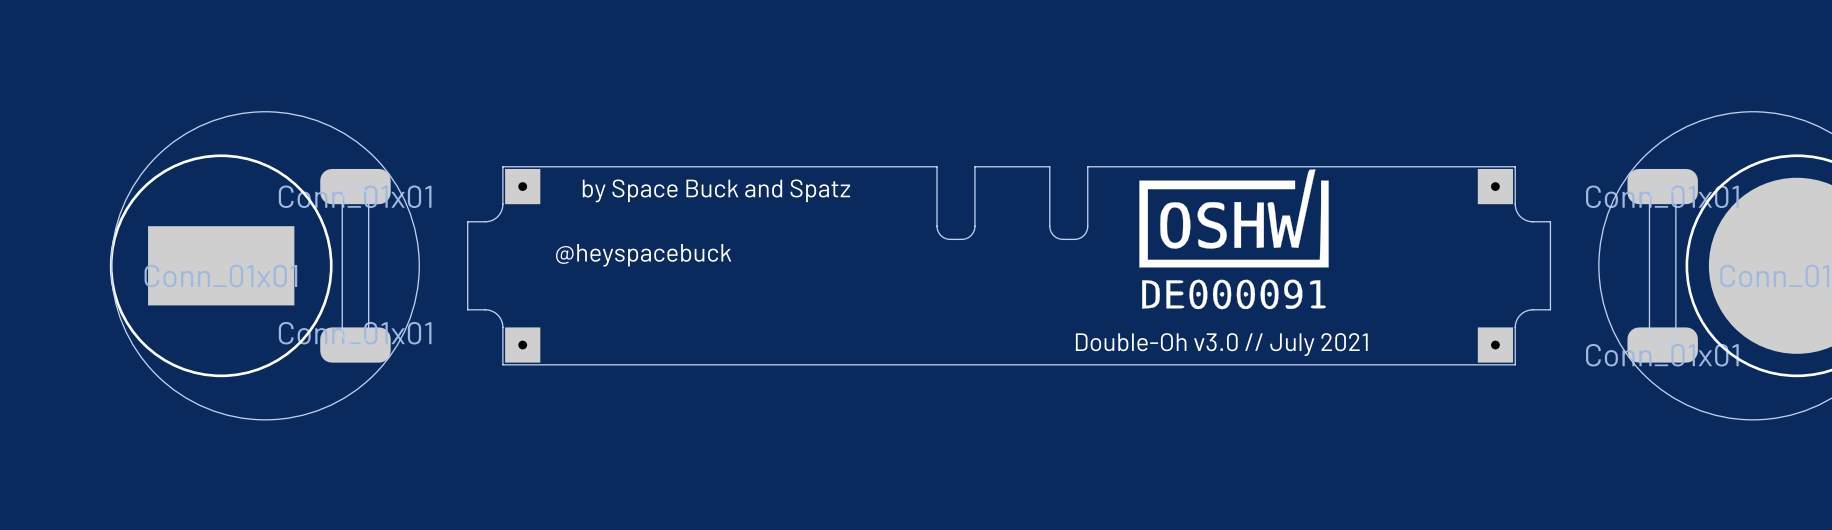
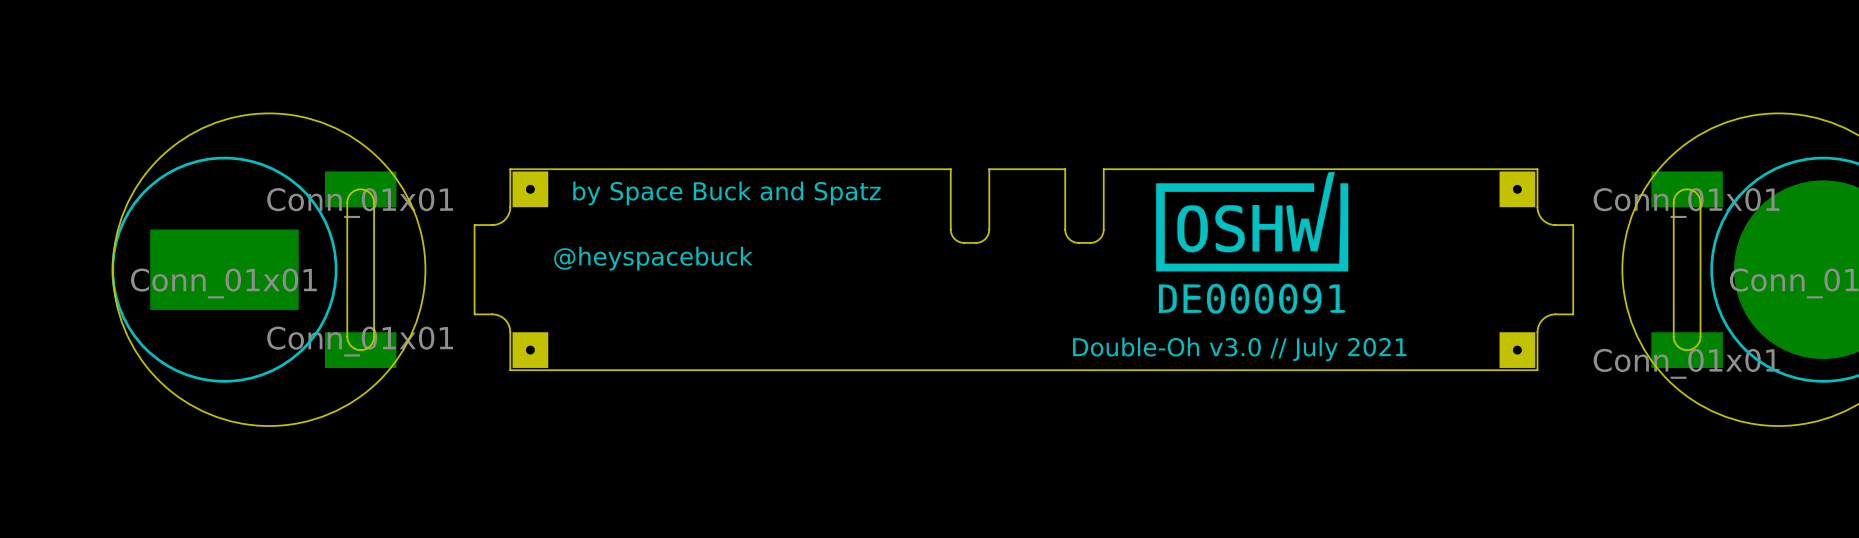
part footprint: [320, 168, 391, 205] -> [324, 171, 397, 208]
part footprint: [1627, 168, 1698, 205] -> [1651, 171, 1723, 208]
part footprint: [320, 327, 391, 363] -> [324, 332, 397, 368]
part footprint: [1627, 327, 1698, 363] -> [1651, 332, 1723, 368]

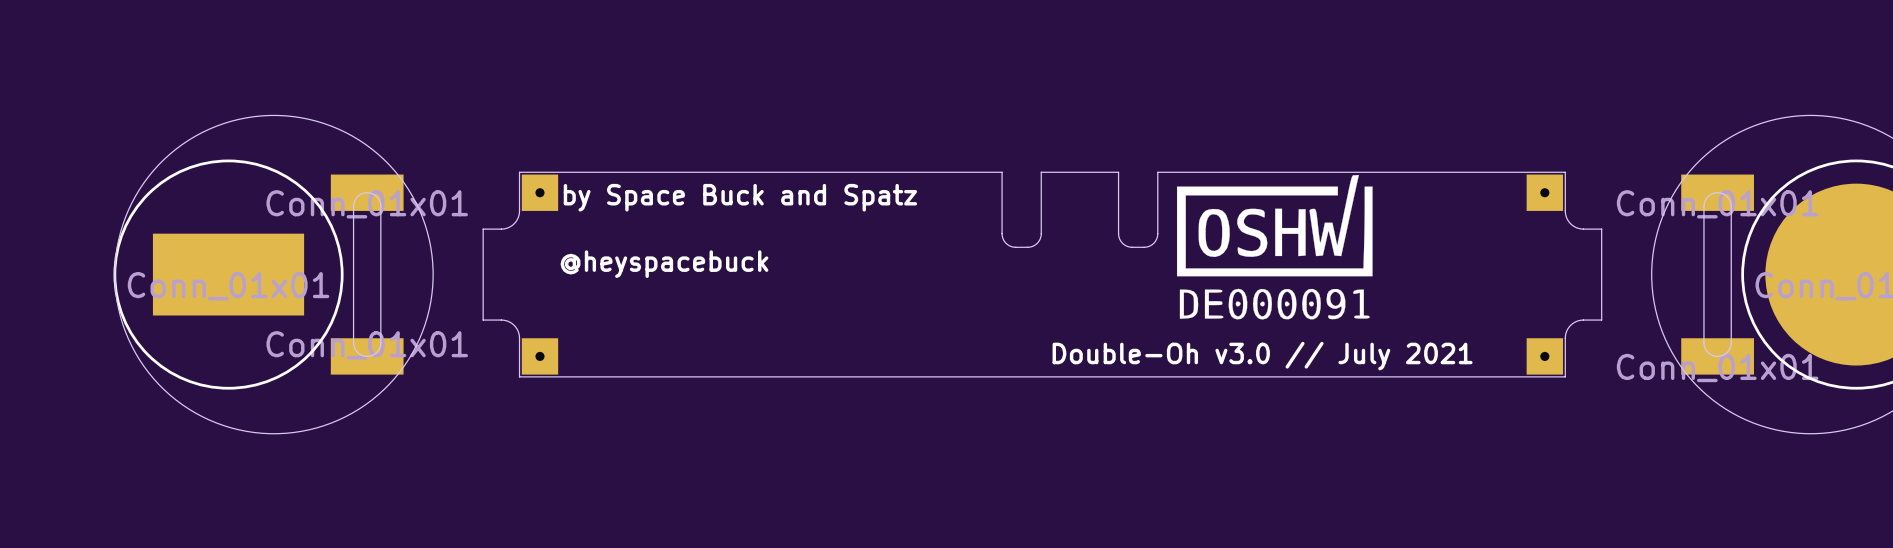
board edge: (950, 169) (950, 229) -> (967, 172) (1002, 172) (1002, 233)
board edge: (1022, 169) (989, 169) (989, 231) (984, 240) (977, 242) (960, 242) (953, 237) (950, 229) -> (1041, 172) (1041, 233) (1039, 240) (1031, 246) (1013, 247) (1004, 241) (1002, 233)
board edge: (1137, 169) (1103, 169) (1103, 231) (1098, 240) (1090, 242) (1073, 241) (1066, 234) (1065, 169) -> (1157, 172) (1157, 235) (1152, 244) (1144, 247) (1126, 246) (1119, 238) (1118, 172) (1084, 172)

